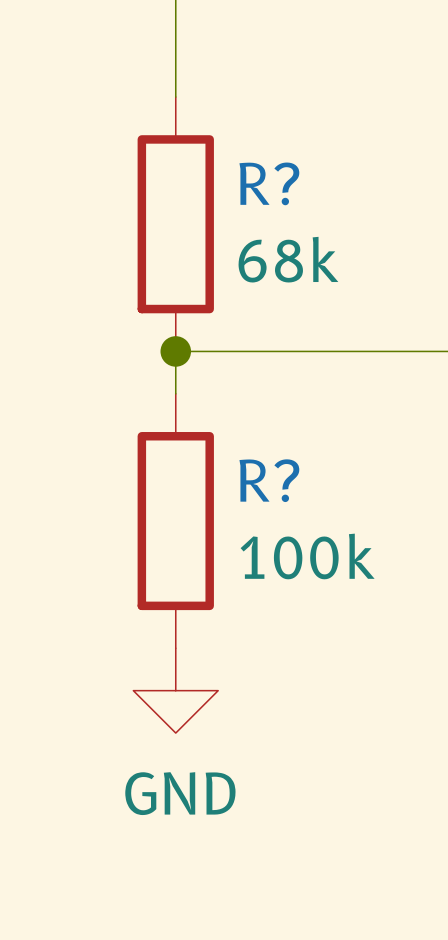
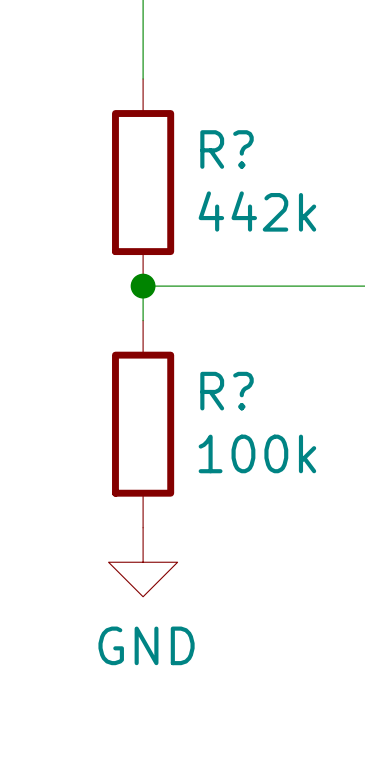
R? value: 68k (288, 259) -> 442k (257, 211)

